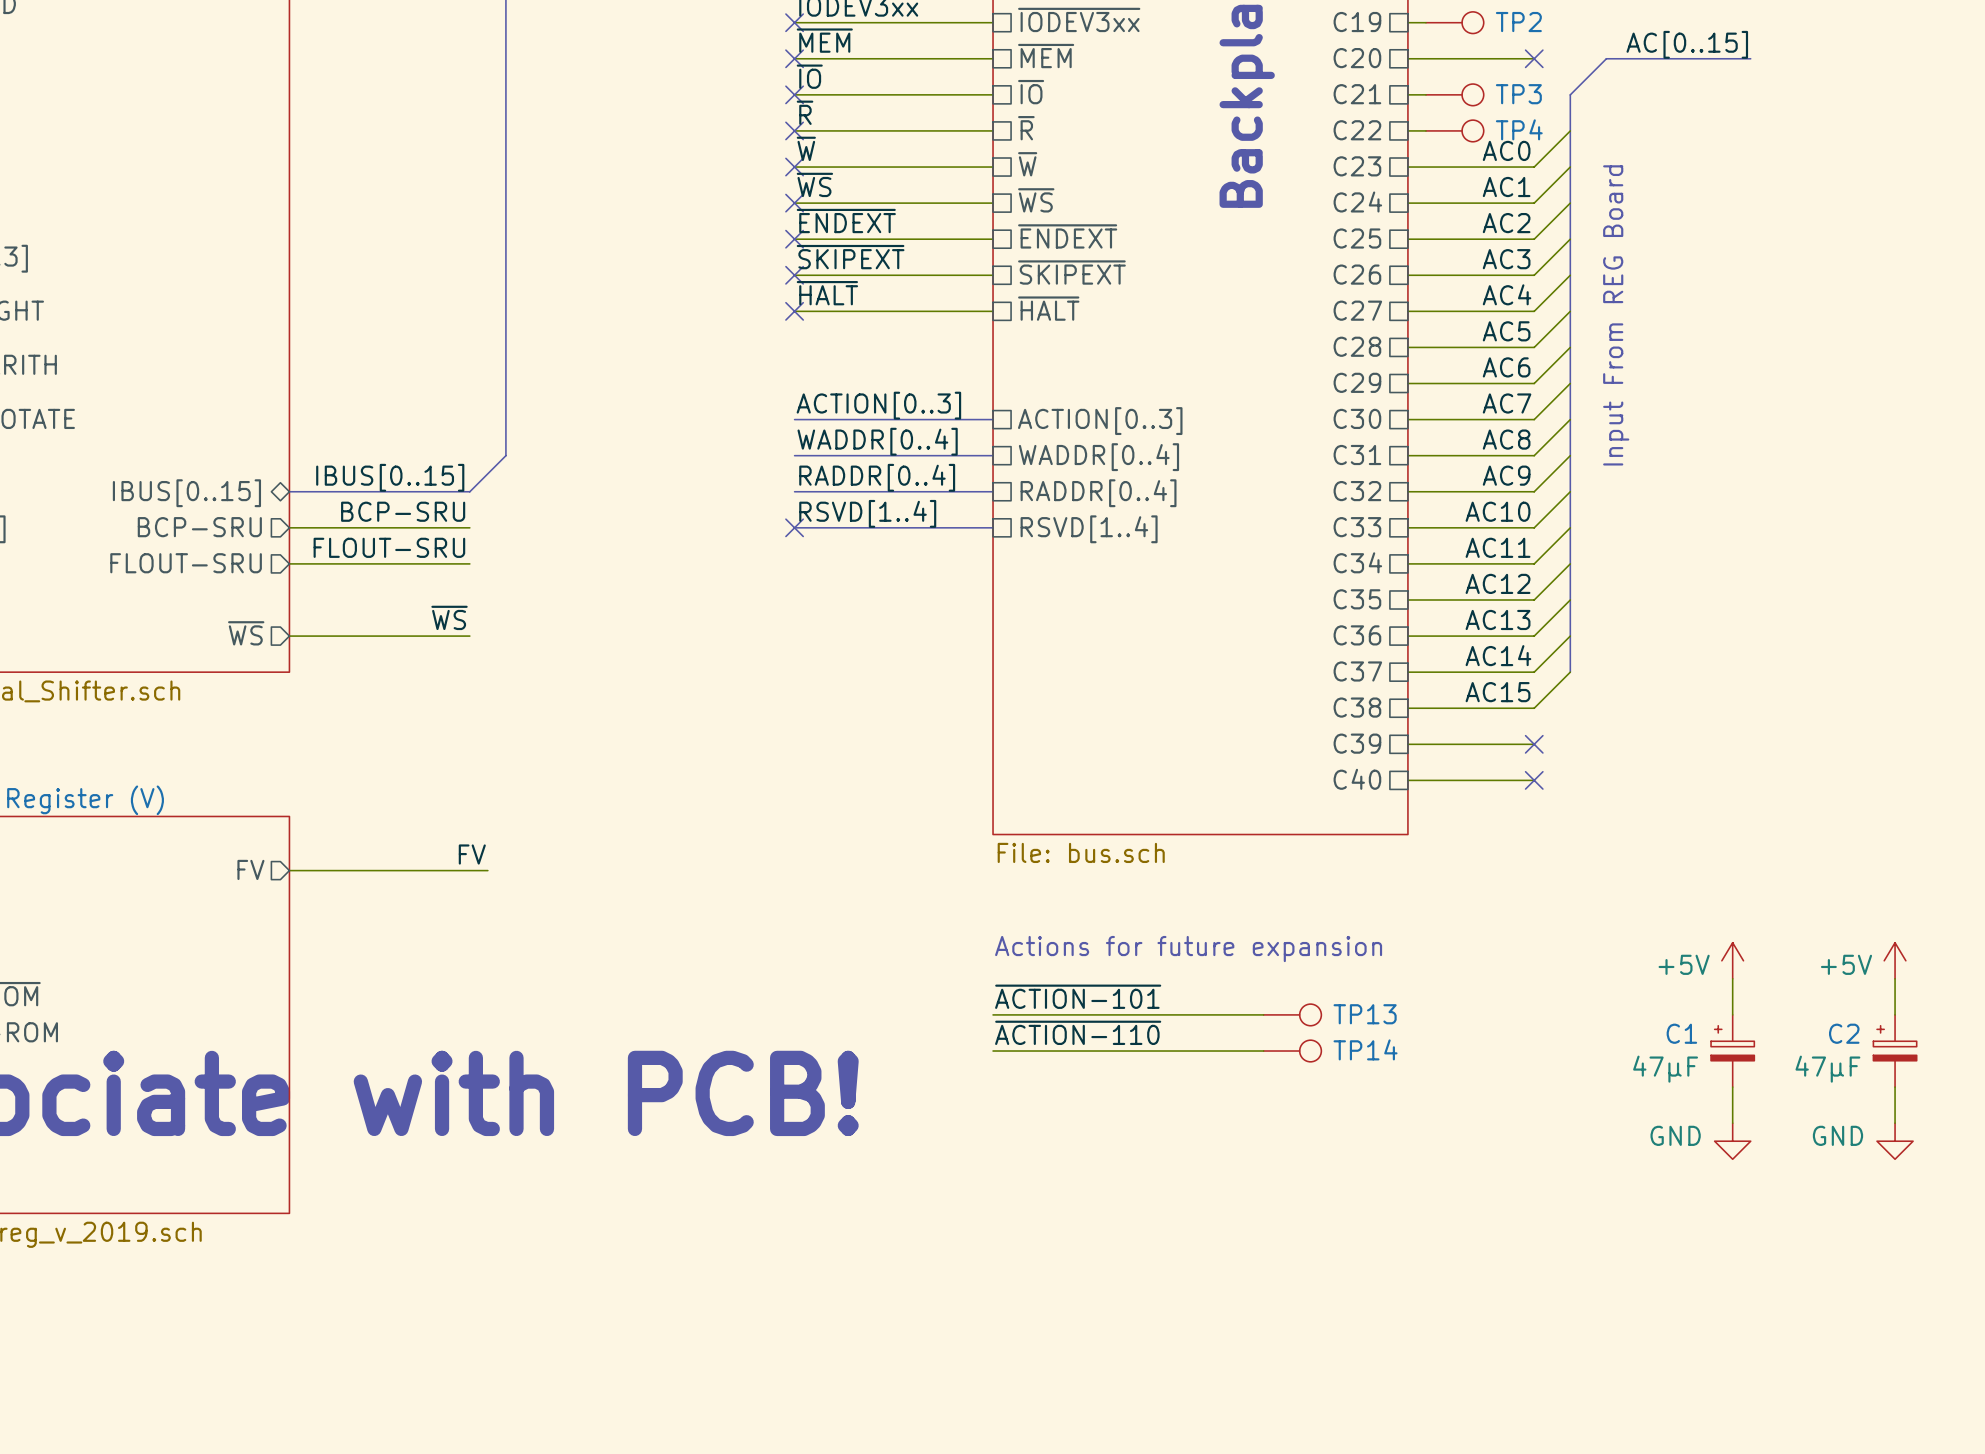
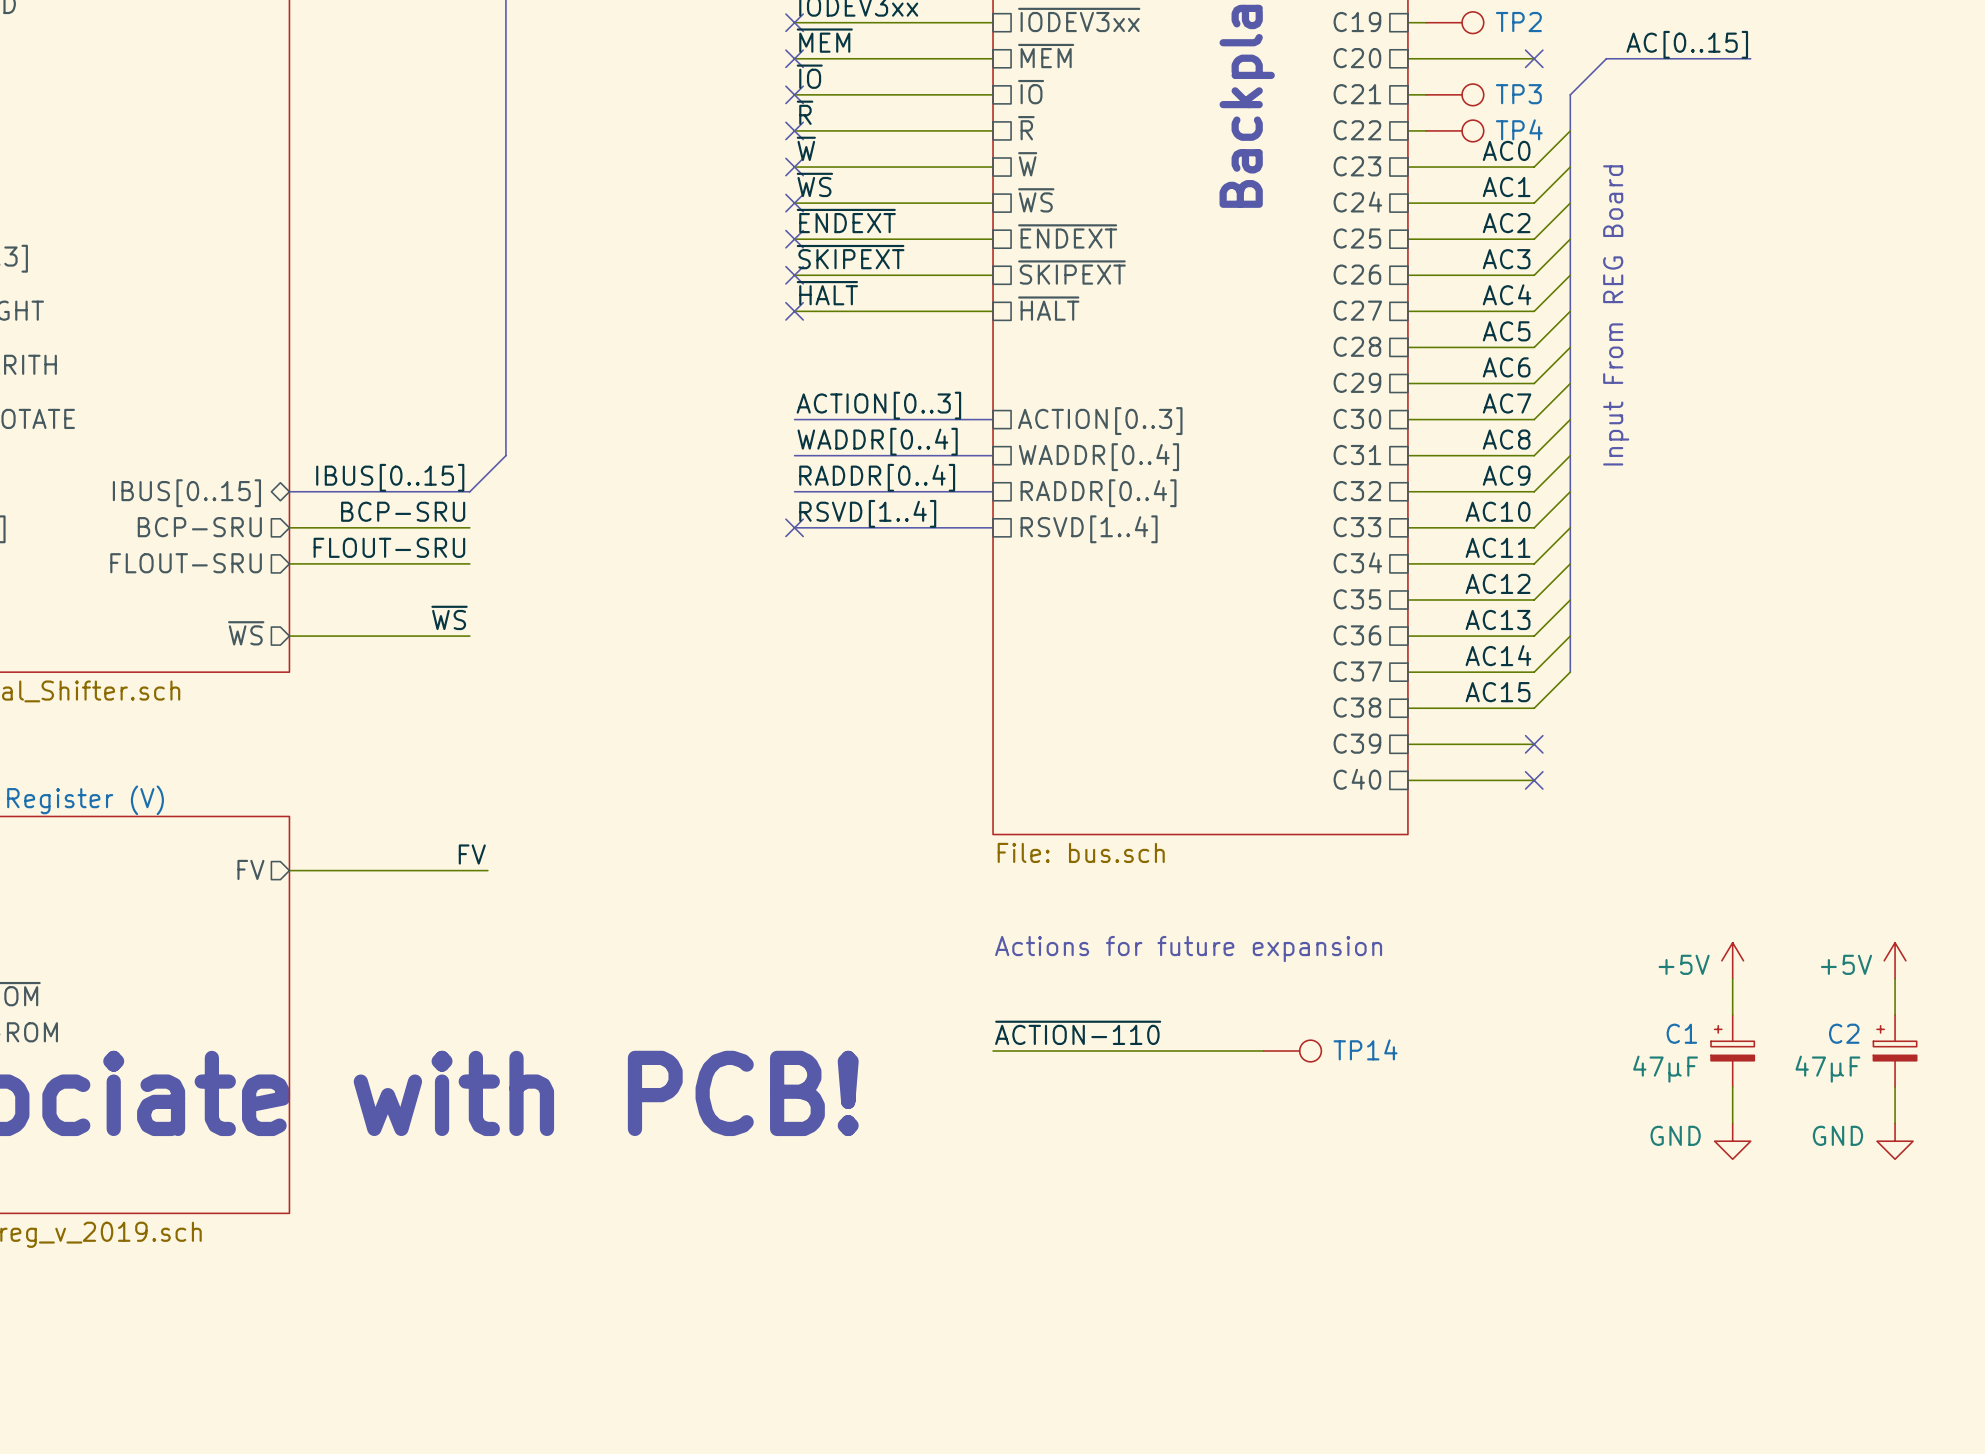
label: ~{ACTION-101} (1078, 996) -> none
wire: (993, 1014) (1263, 1014) -> none
TP13: (1292, 1014) -> none

